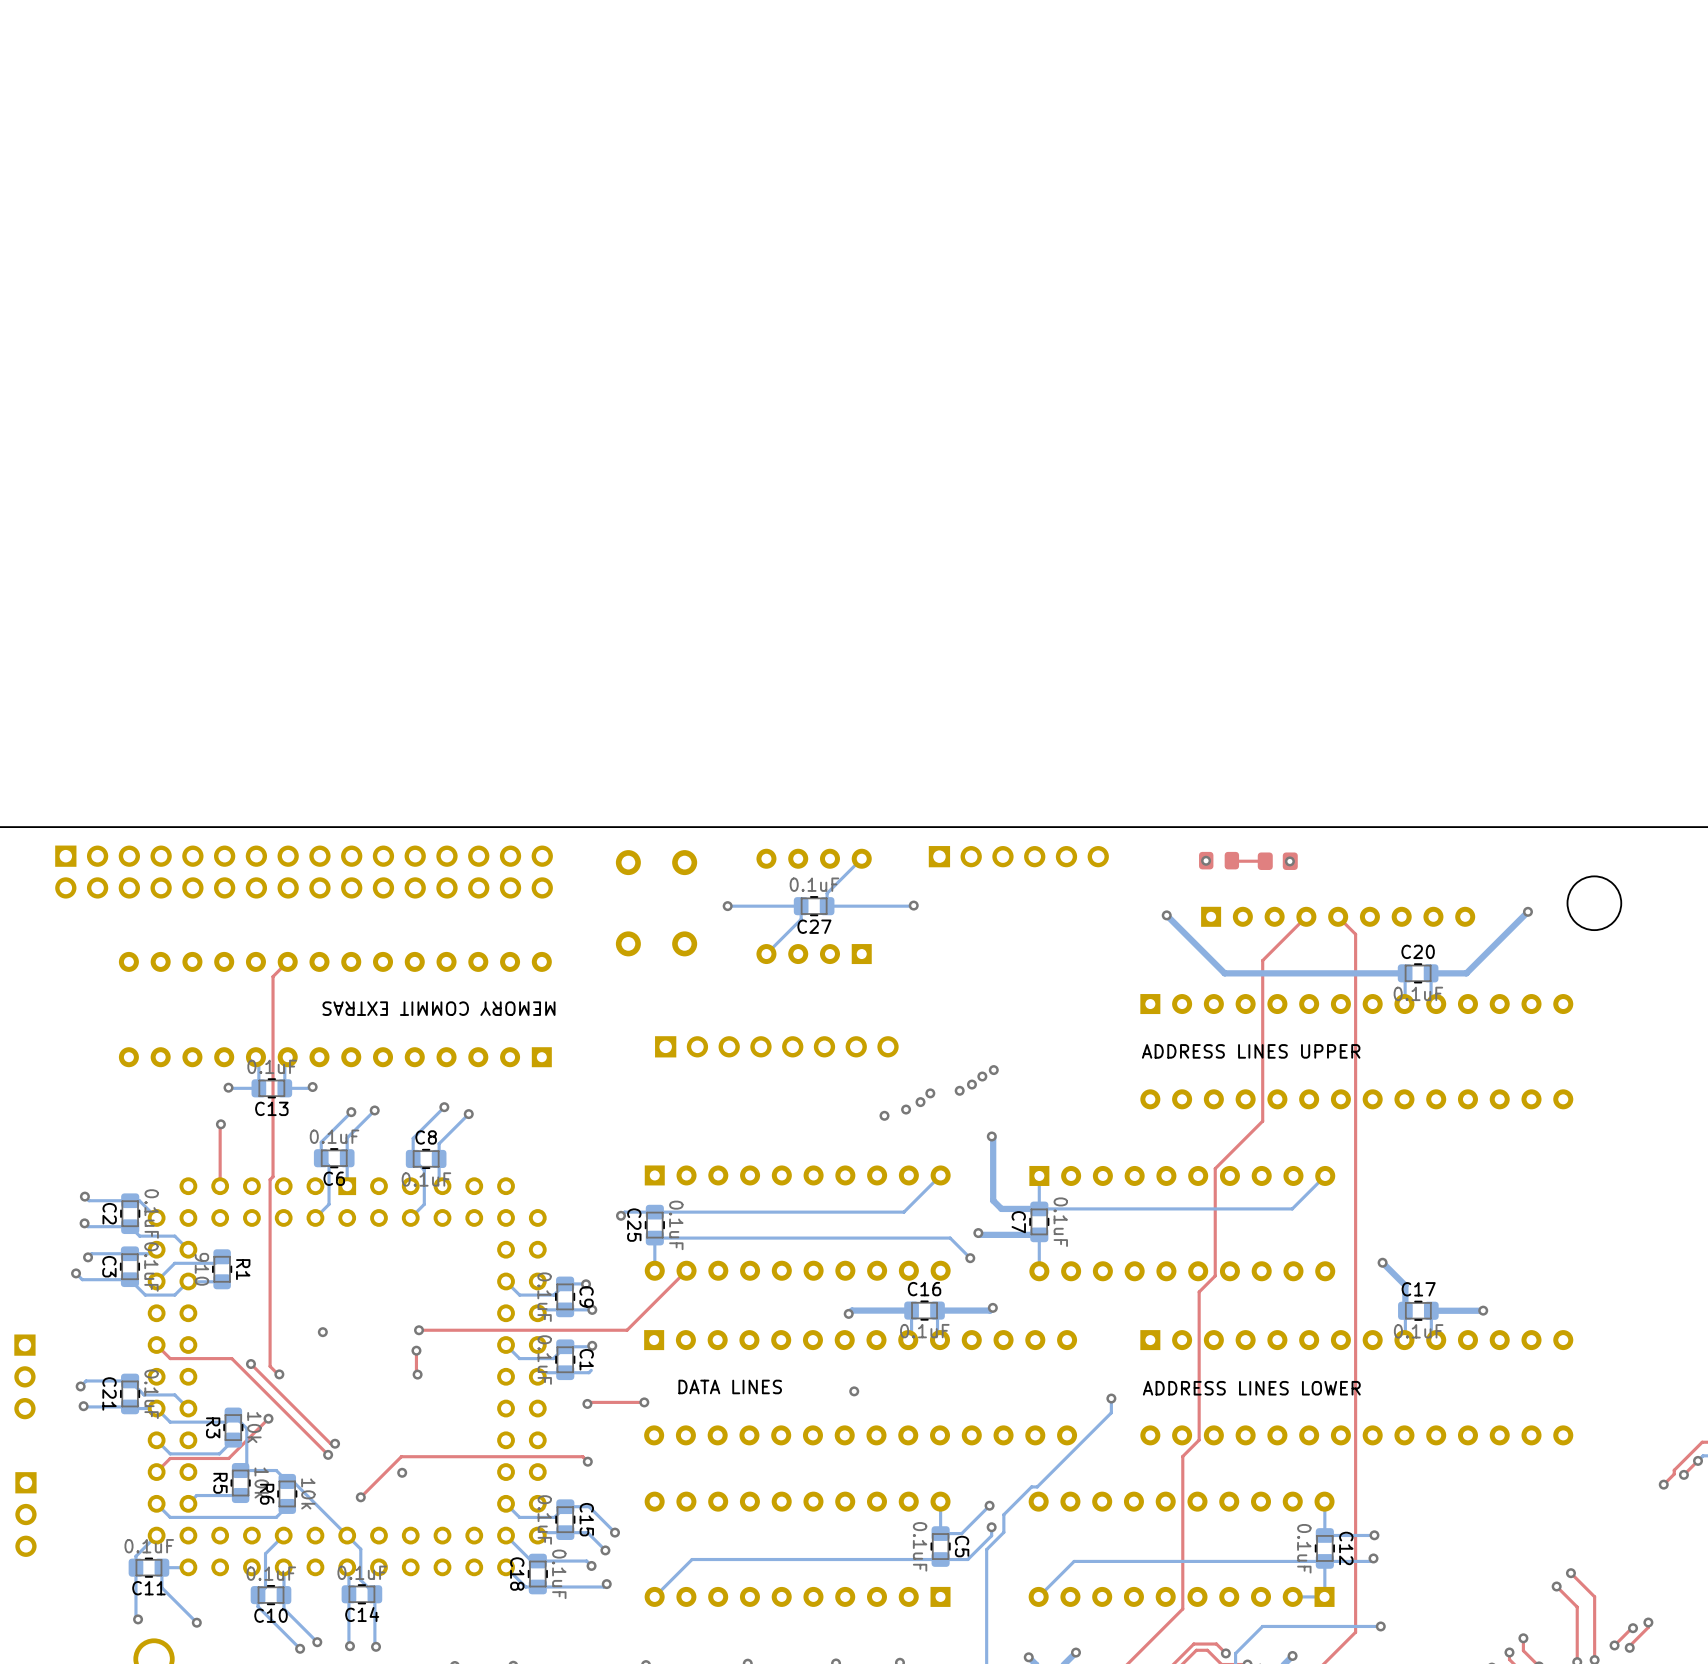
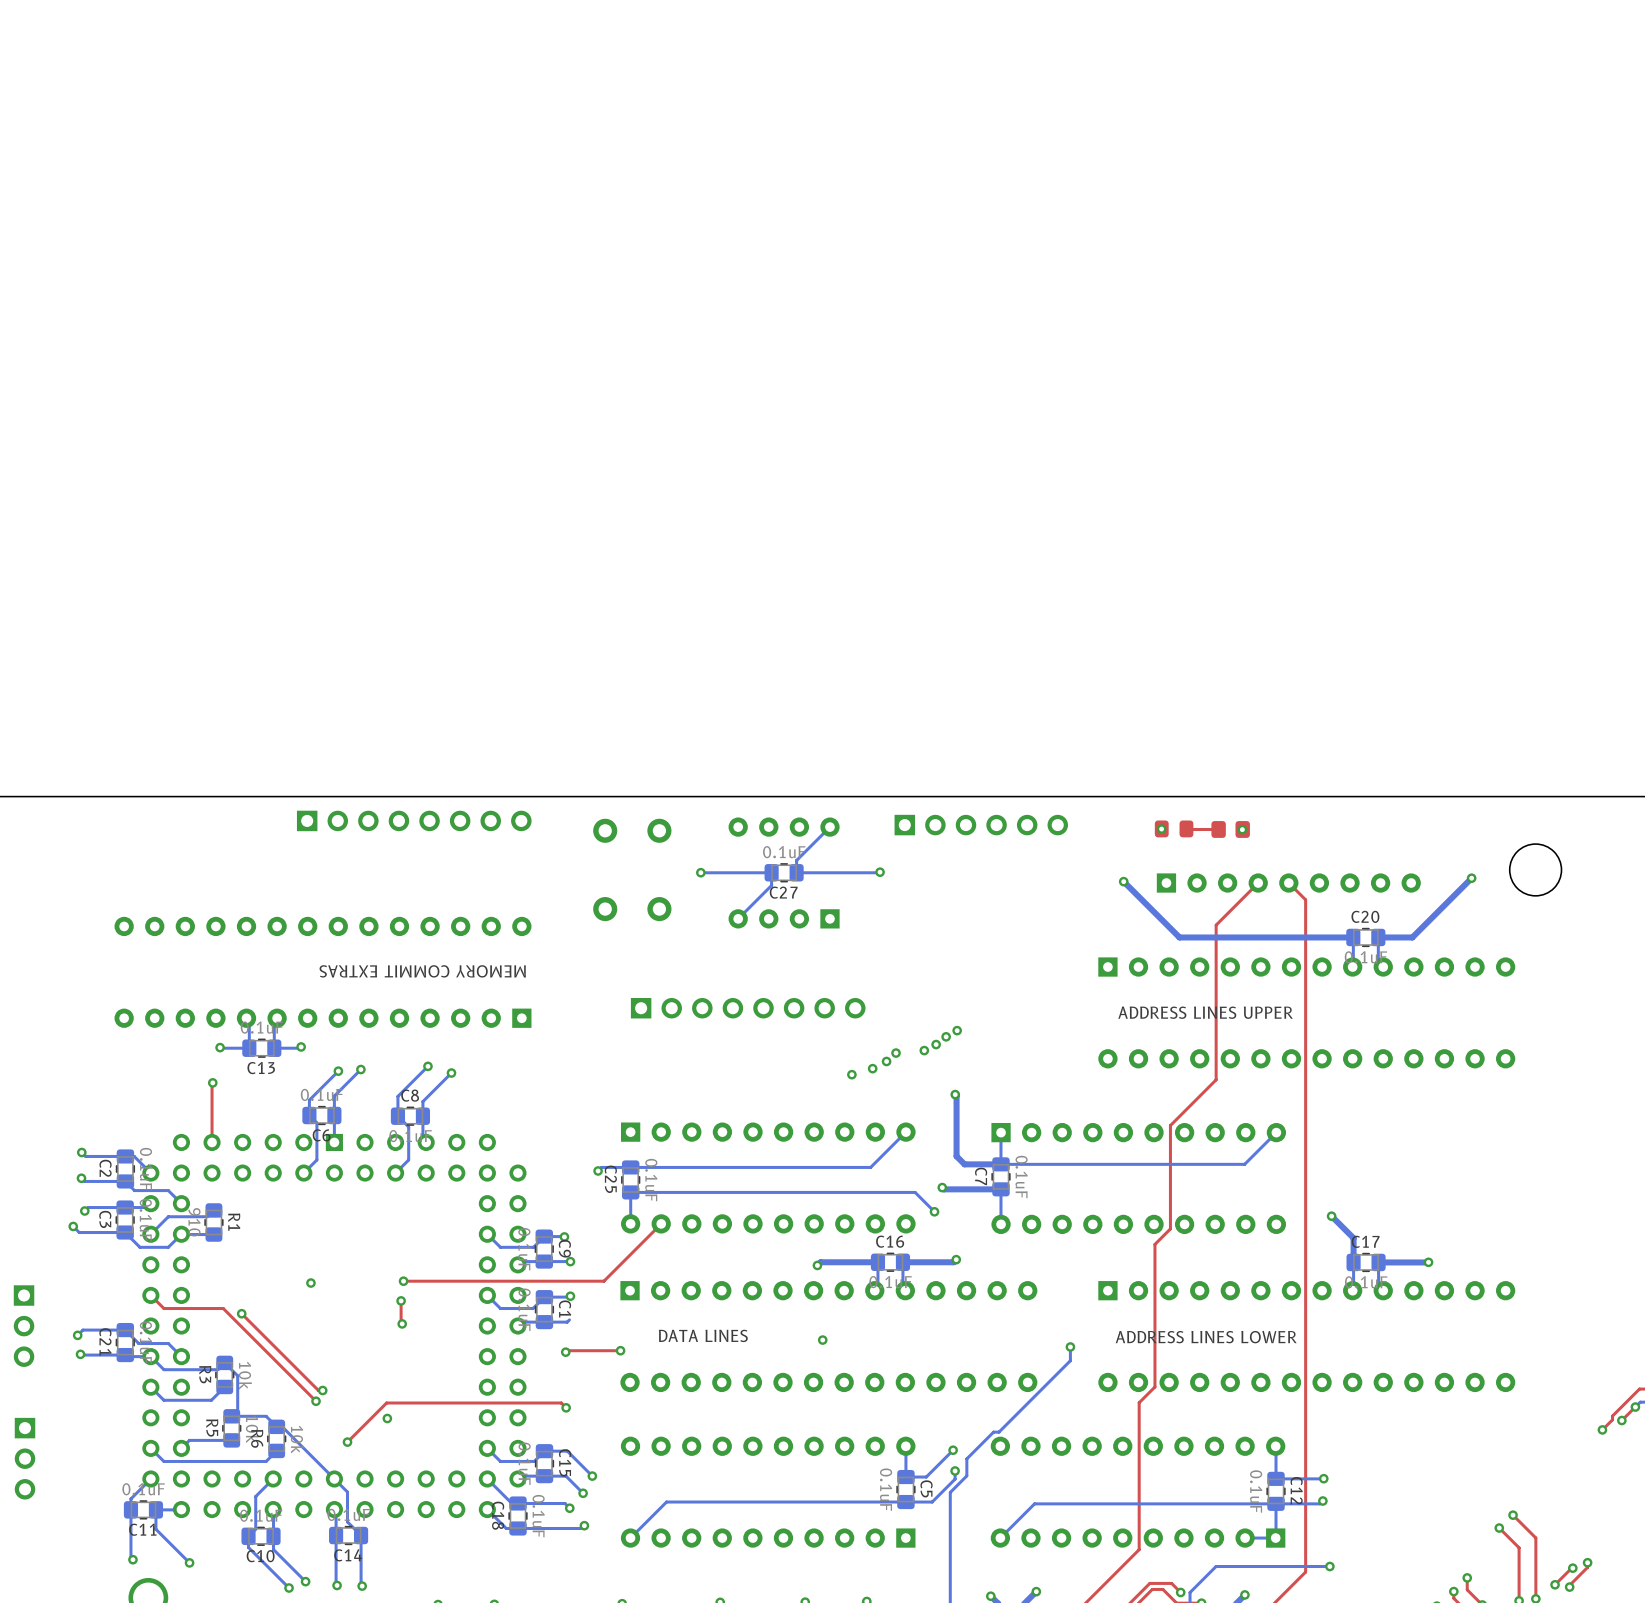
part: none -> (414, 820)
part: (304, 872) -> none
top track: (287, 961) (273, 976) (273, 1176) (270, 1179) (270, 1366) (279, 1374) -> none
via: (279, 1374) -> none
top track: (268, 1418) (228, 1458) (170, 1458) (156, 1472) -> none
via: (268, 1418) -> none

